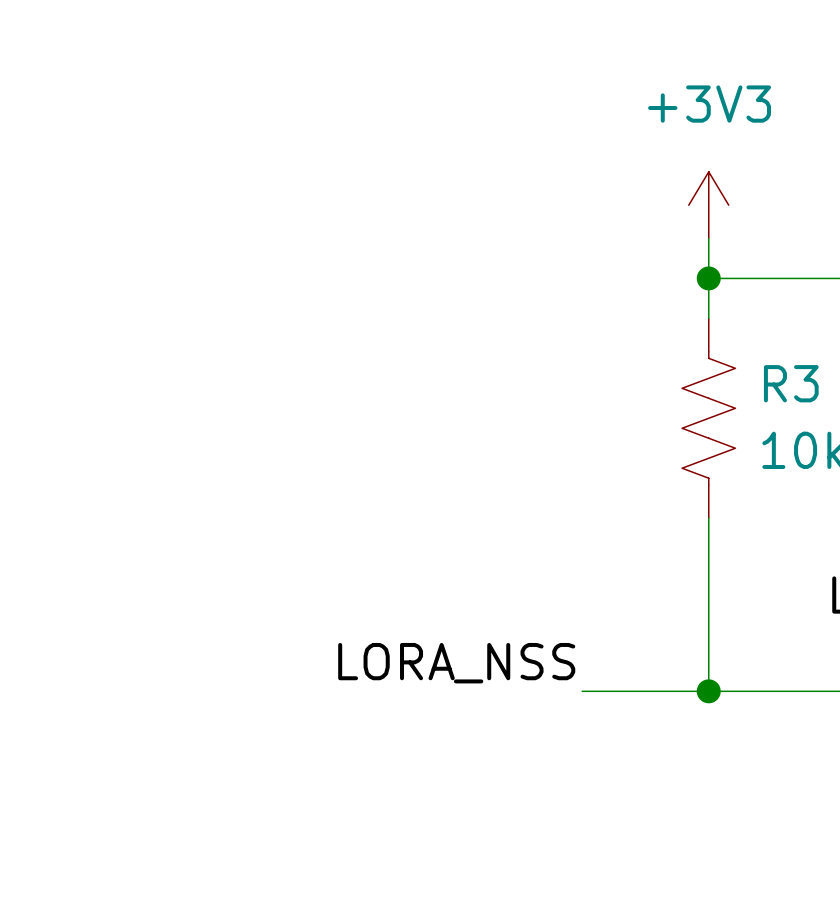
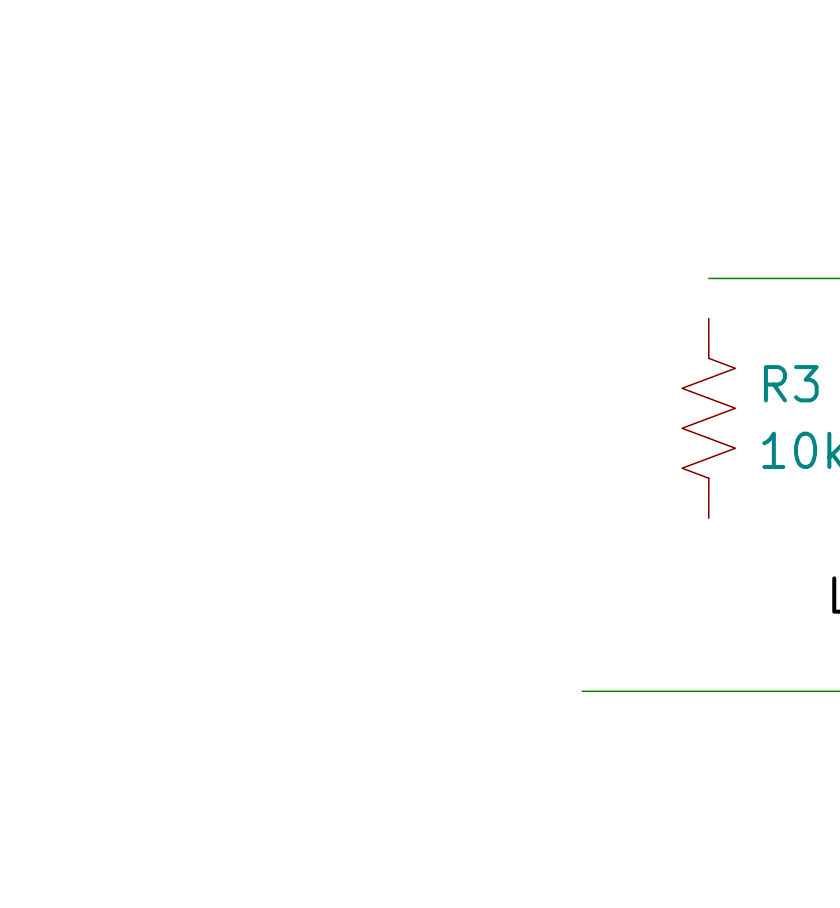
power symbol: +3V3 (708, 205) -> none
wire: (708, 238) (708, 318) -> none
junction: (708, 278) -> none
wire: (708, 518) (708, 691) -> none
label: LORA_NSS (456, 663) -> none
junction: (708, 691) -> none

